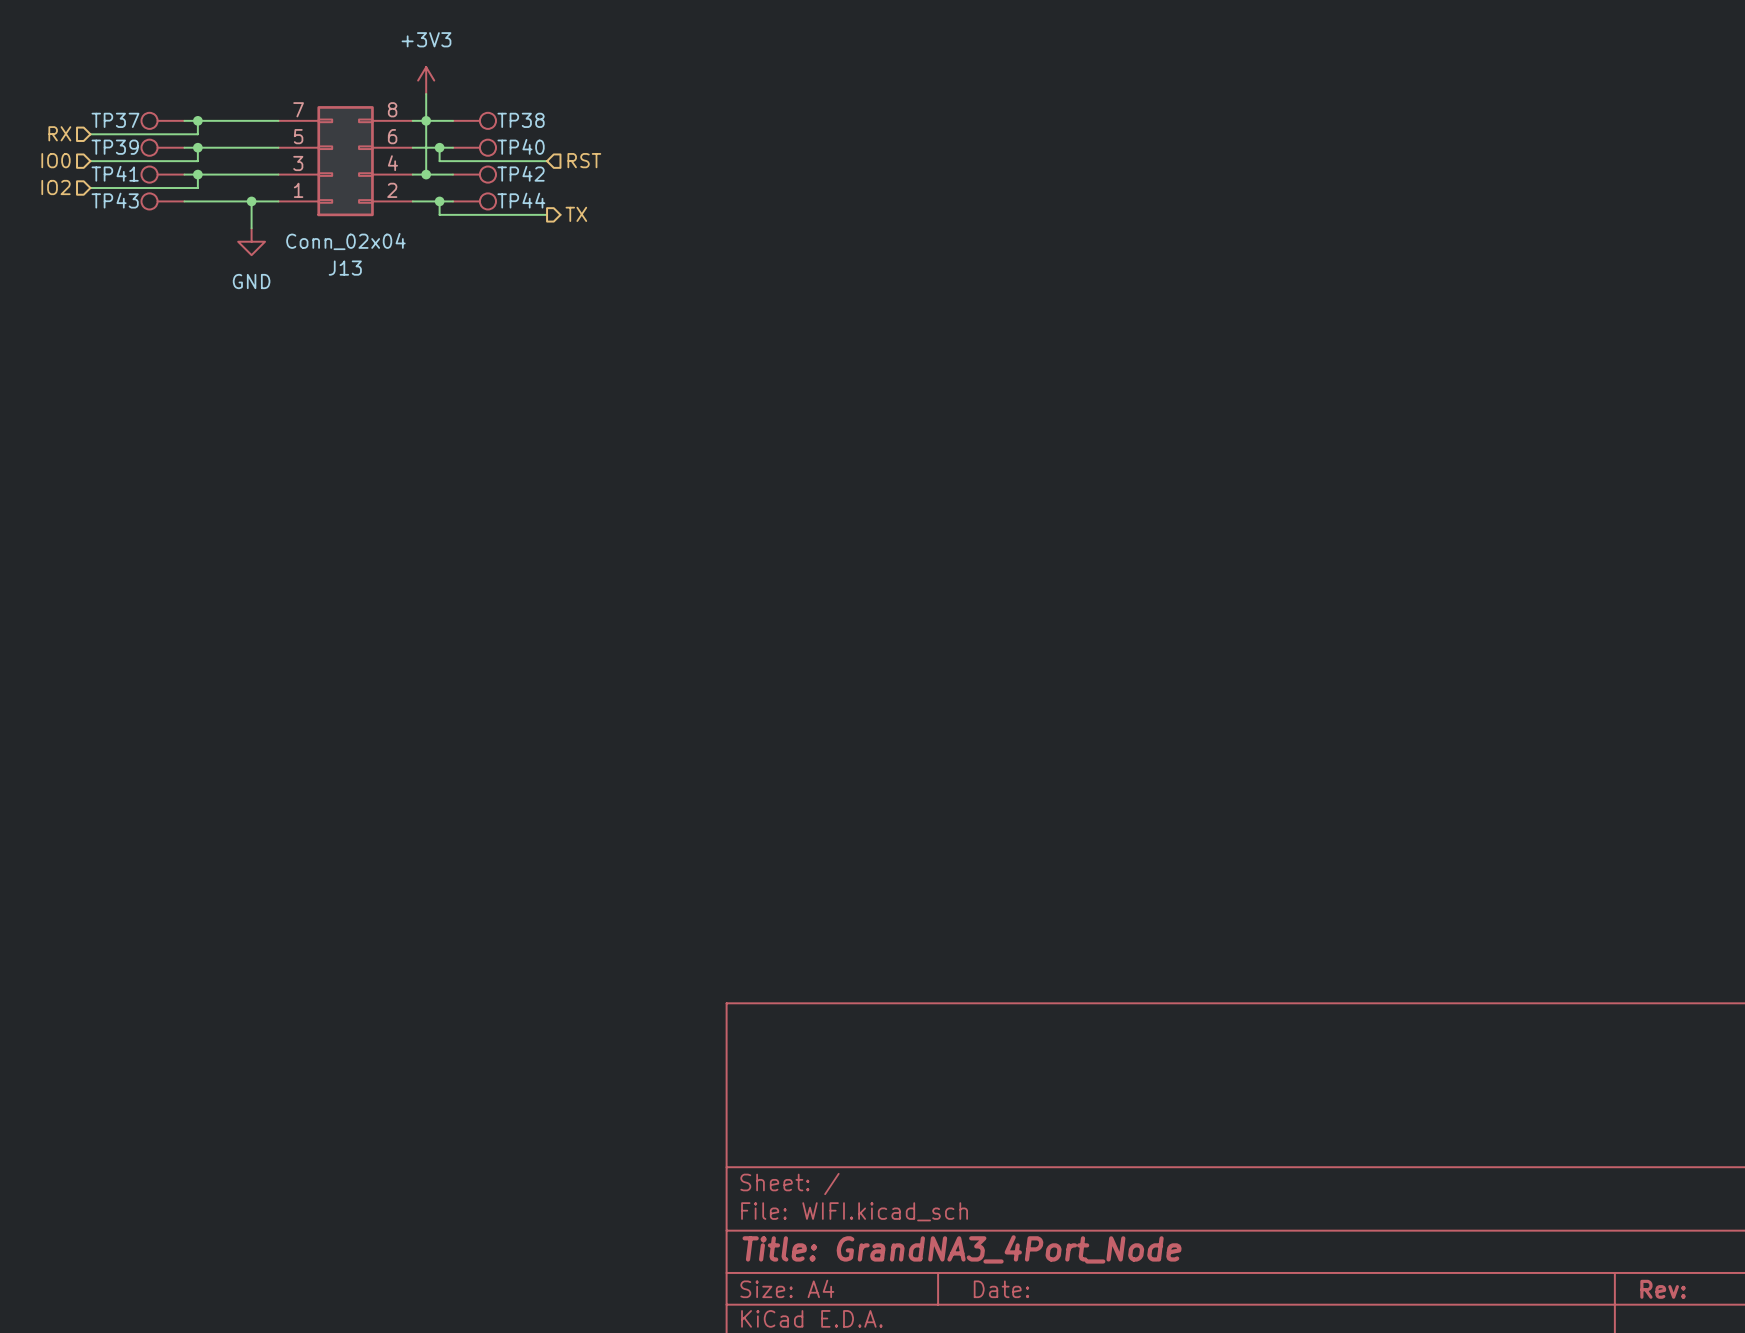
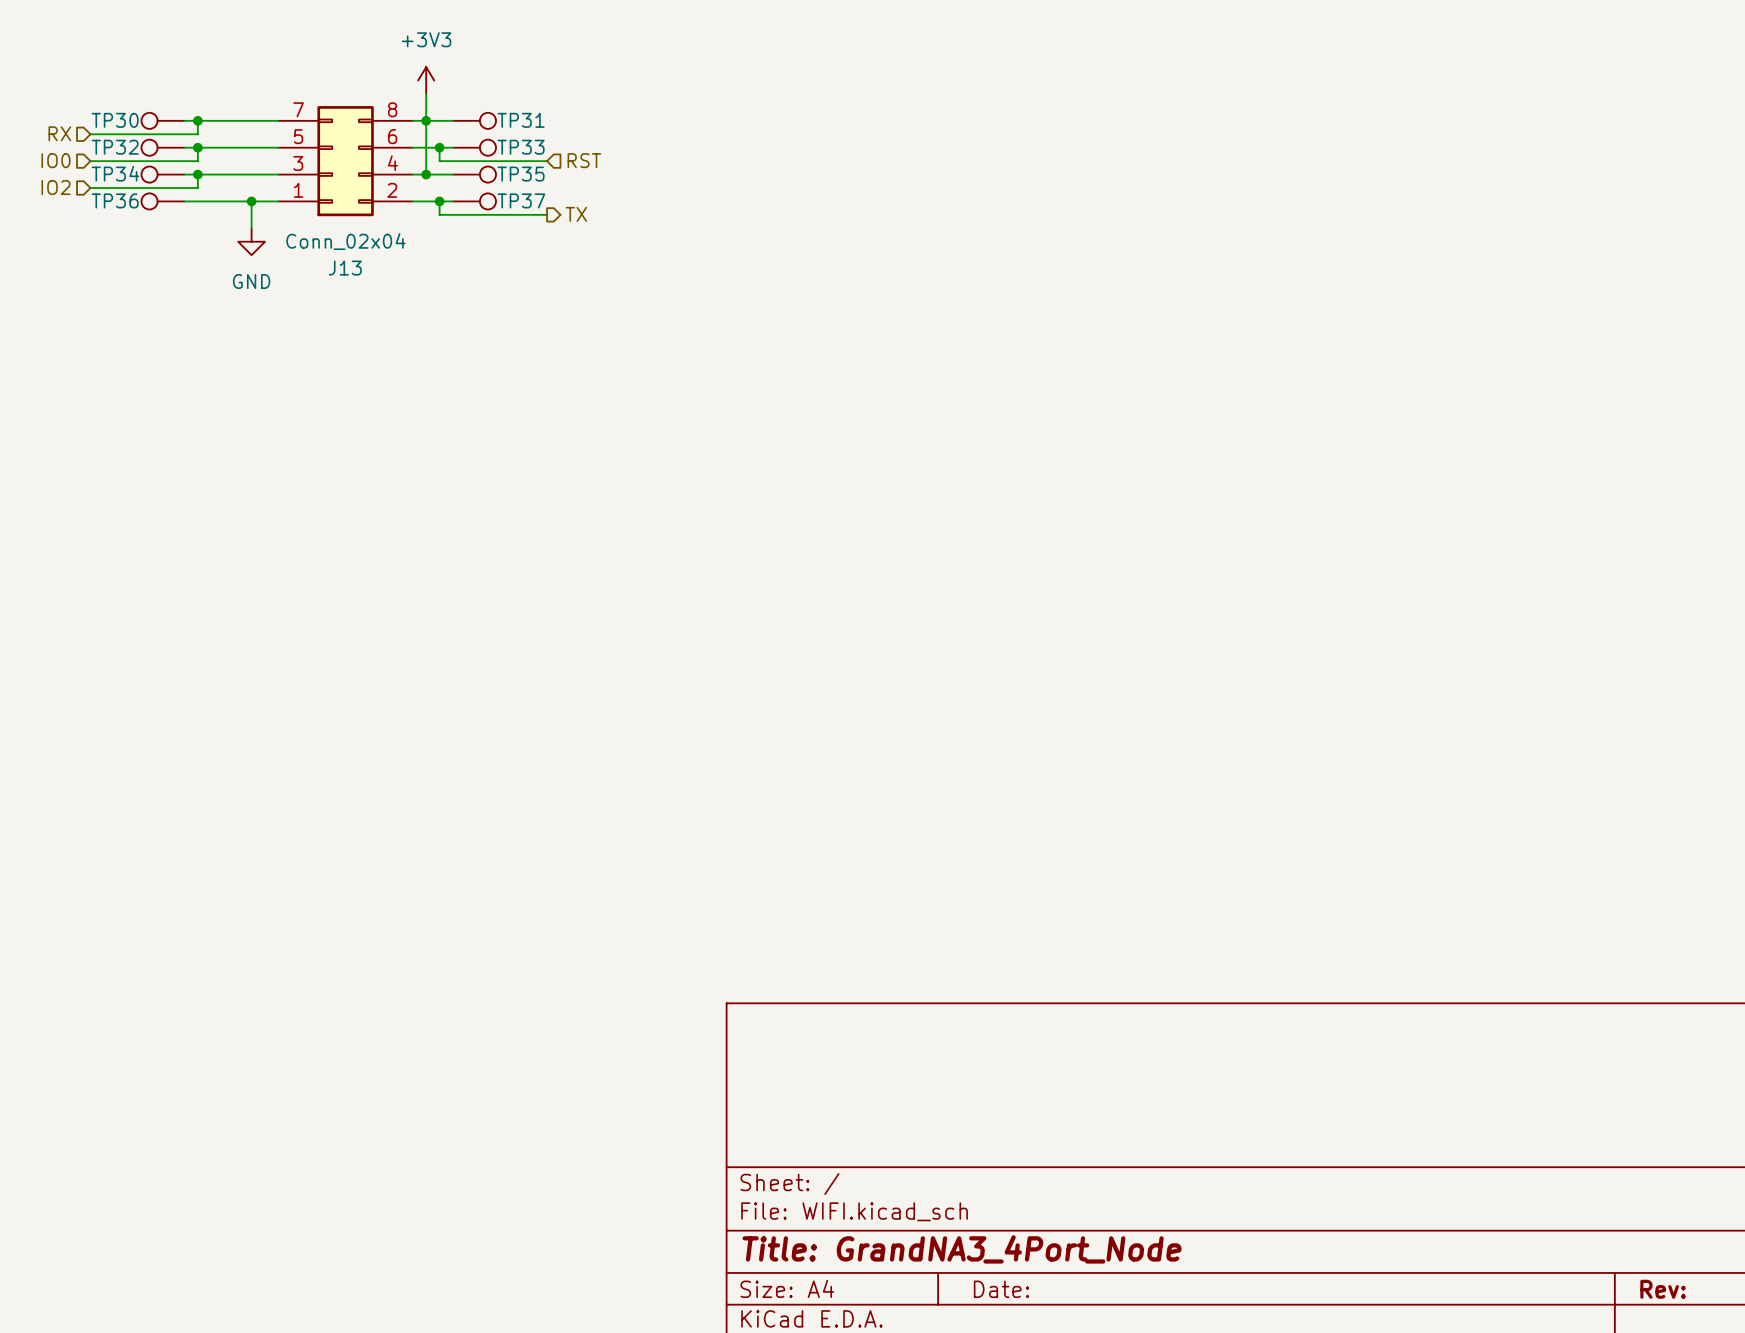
TP37 name: TP37 (115, 120) -> TP30 (115, 120)
TP38 name: TP38 (521, 120) -> TP31 (521, 120)
TP40 name: TP40 (521, 146) -> TP33 (521, 147)
TP39 name: TP39 (115, 147) -> TP32 (115, 147)
TP41 name: TP41 (115, 173) -> TP34 (115, 173)
TP42 name: TP42 (521, 173) -> TP35 (521, 174)
TP43 name: TP43 (115, 200) -> TP36 (115, 200)
TP44 name: TP44 (521, 200) -> TP37 (521, 200)

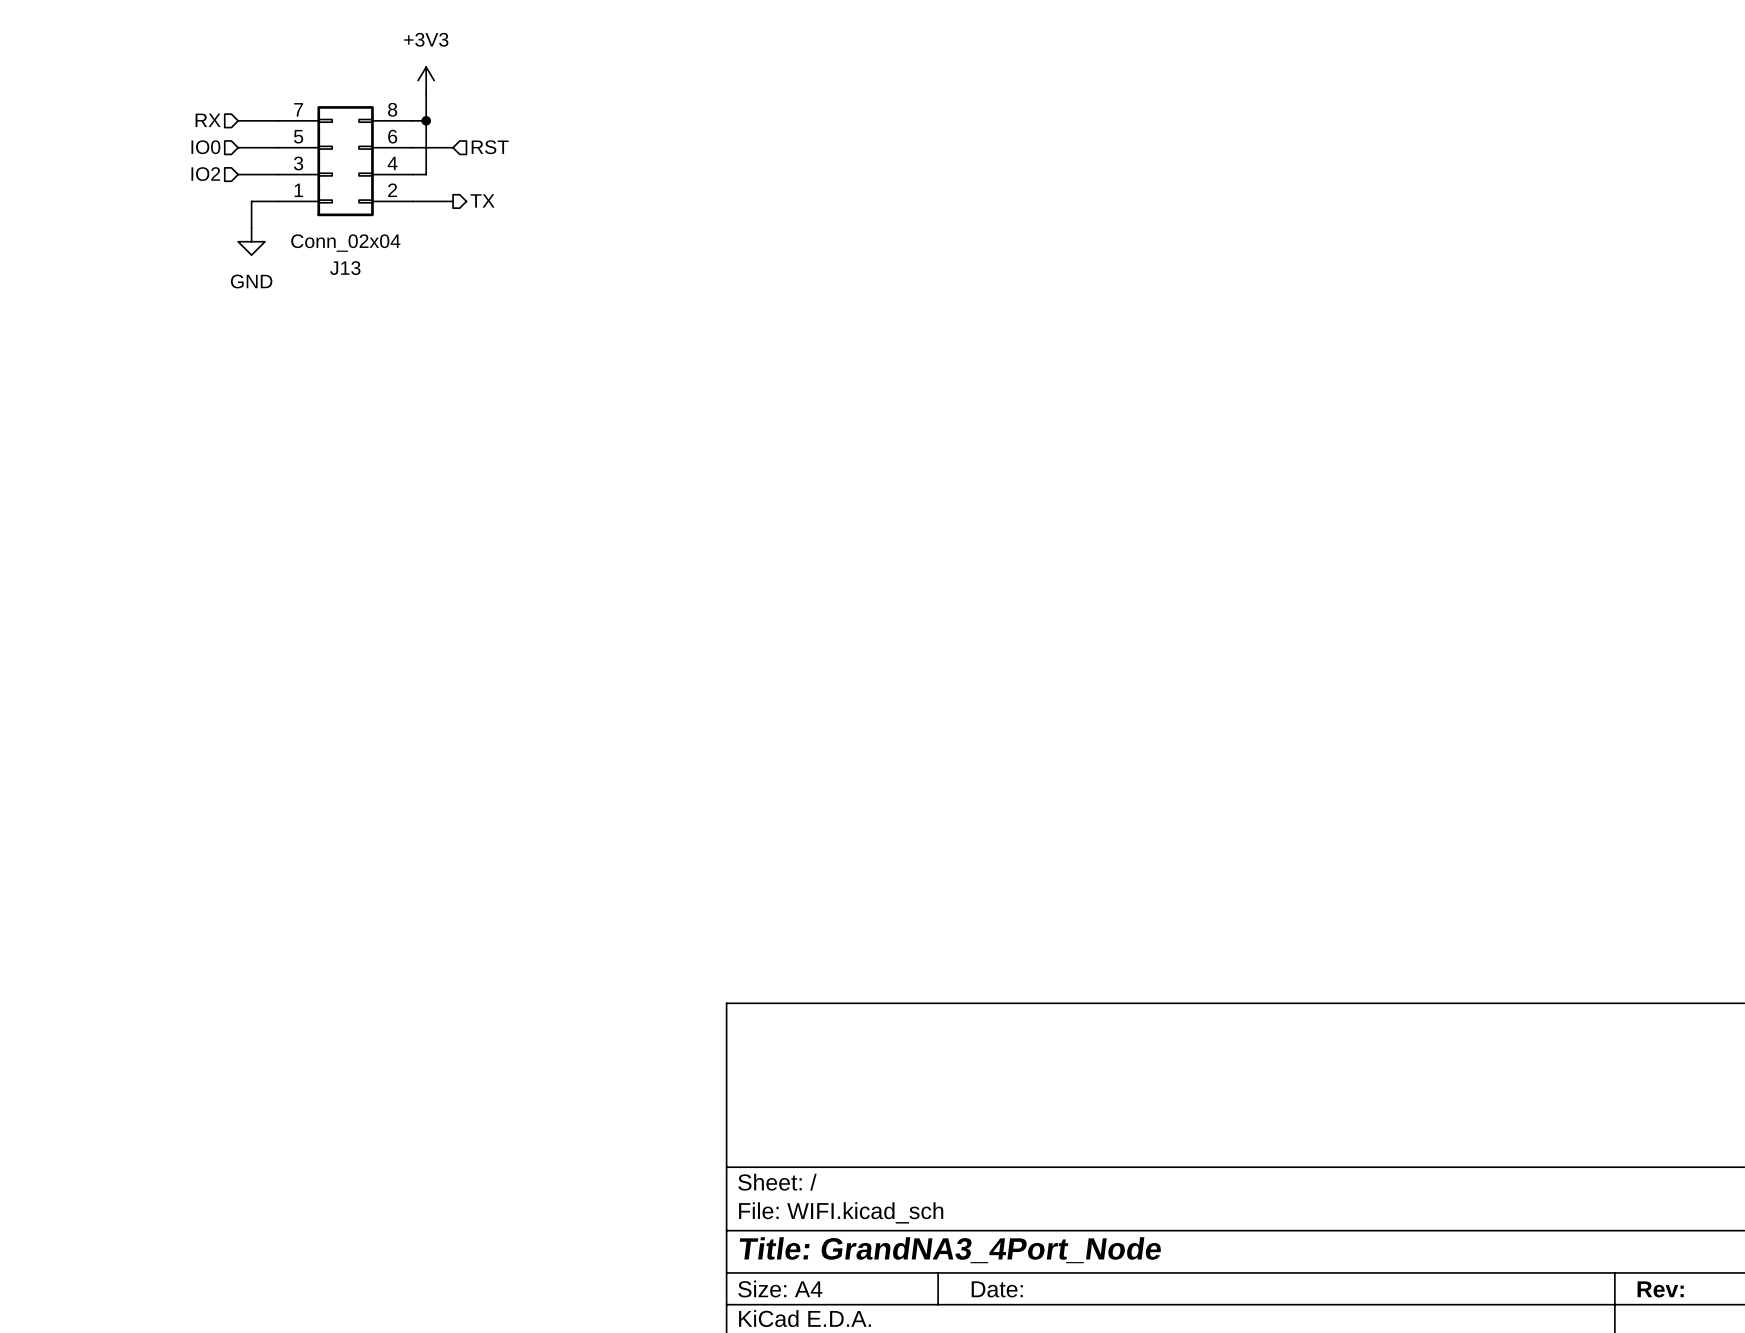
TP30: (162, 120) -> none
wire: (184, 120) (238, 120) -> none
wire: (197, 120) (197, 134) (90, 134) -> none
junction: (197, 120) -> none
wire: (426, 120) (453, 120) -> none
TP31: (474, 120) -> none
hierarchical label position: RX (59, 133) -> RX (208, 120)
TP32: (162, 147) -> none
wire: (184, 147) (238, 147) -> none
wire: (197, 147) (197, 161) (90, 161) -> none
junction: (197, 147) -> none
wire: (439, 147) (439, 161) (547, 161) -> none
junction: (439, 147) -> none
TP33: (474, 147) -> none
hierarchical label position: IO0 (56, 160) -> IO0 (205, 147)
hierarchical label position: RST (584, 160) -> RST (490, 147)
TP34: (162, 174) -> none
wire: (184, 174) (238, 174) -> none
wire: (197, 174) (197, 188) (90, 188) -> none
junction: (197, 174) -> none
wire: (426, 174) (453, 174) -> none
junction: (426, 174) -> none
TP35: (474, 174) -> none
hierarchical label position: IO2 (56, 187) -> IO2 (205, 174)
TP36: (162, 201) -> none
wire: (184, 201) (251, 201) -> none
junction: (251, 201) -> none
wire: (439, 201) (439, 214) (547, 214) -> none
junction: (439, 201) -> none
TP37: (474, 201) -> none
hierarchical label position: TX (576, 214) -> TX (482, 200)

